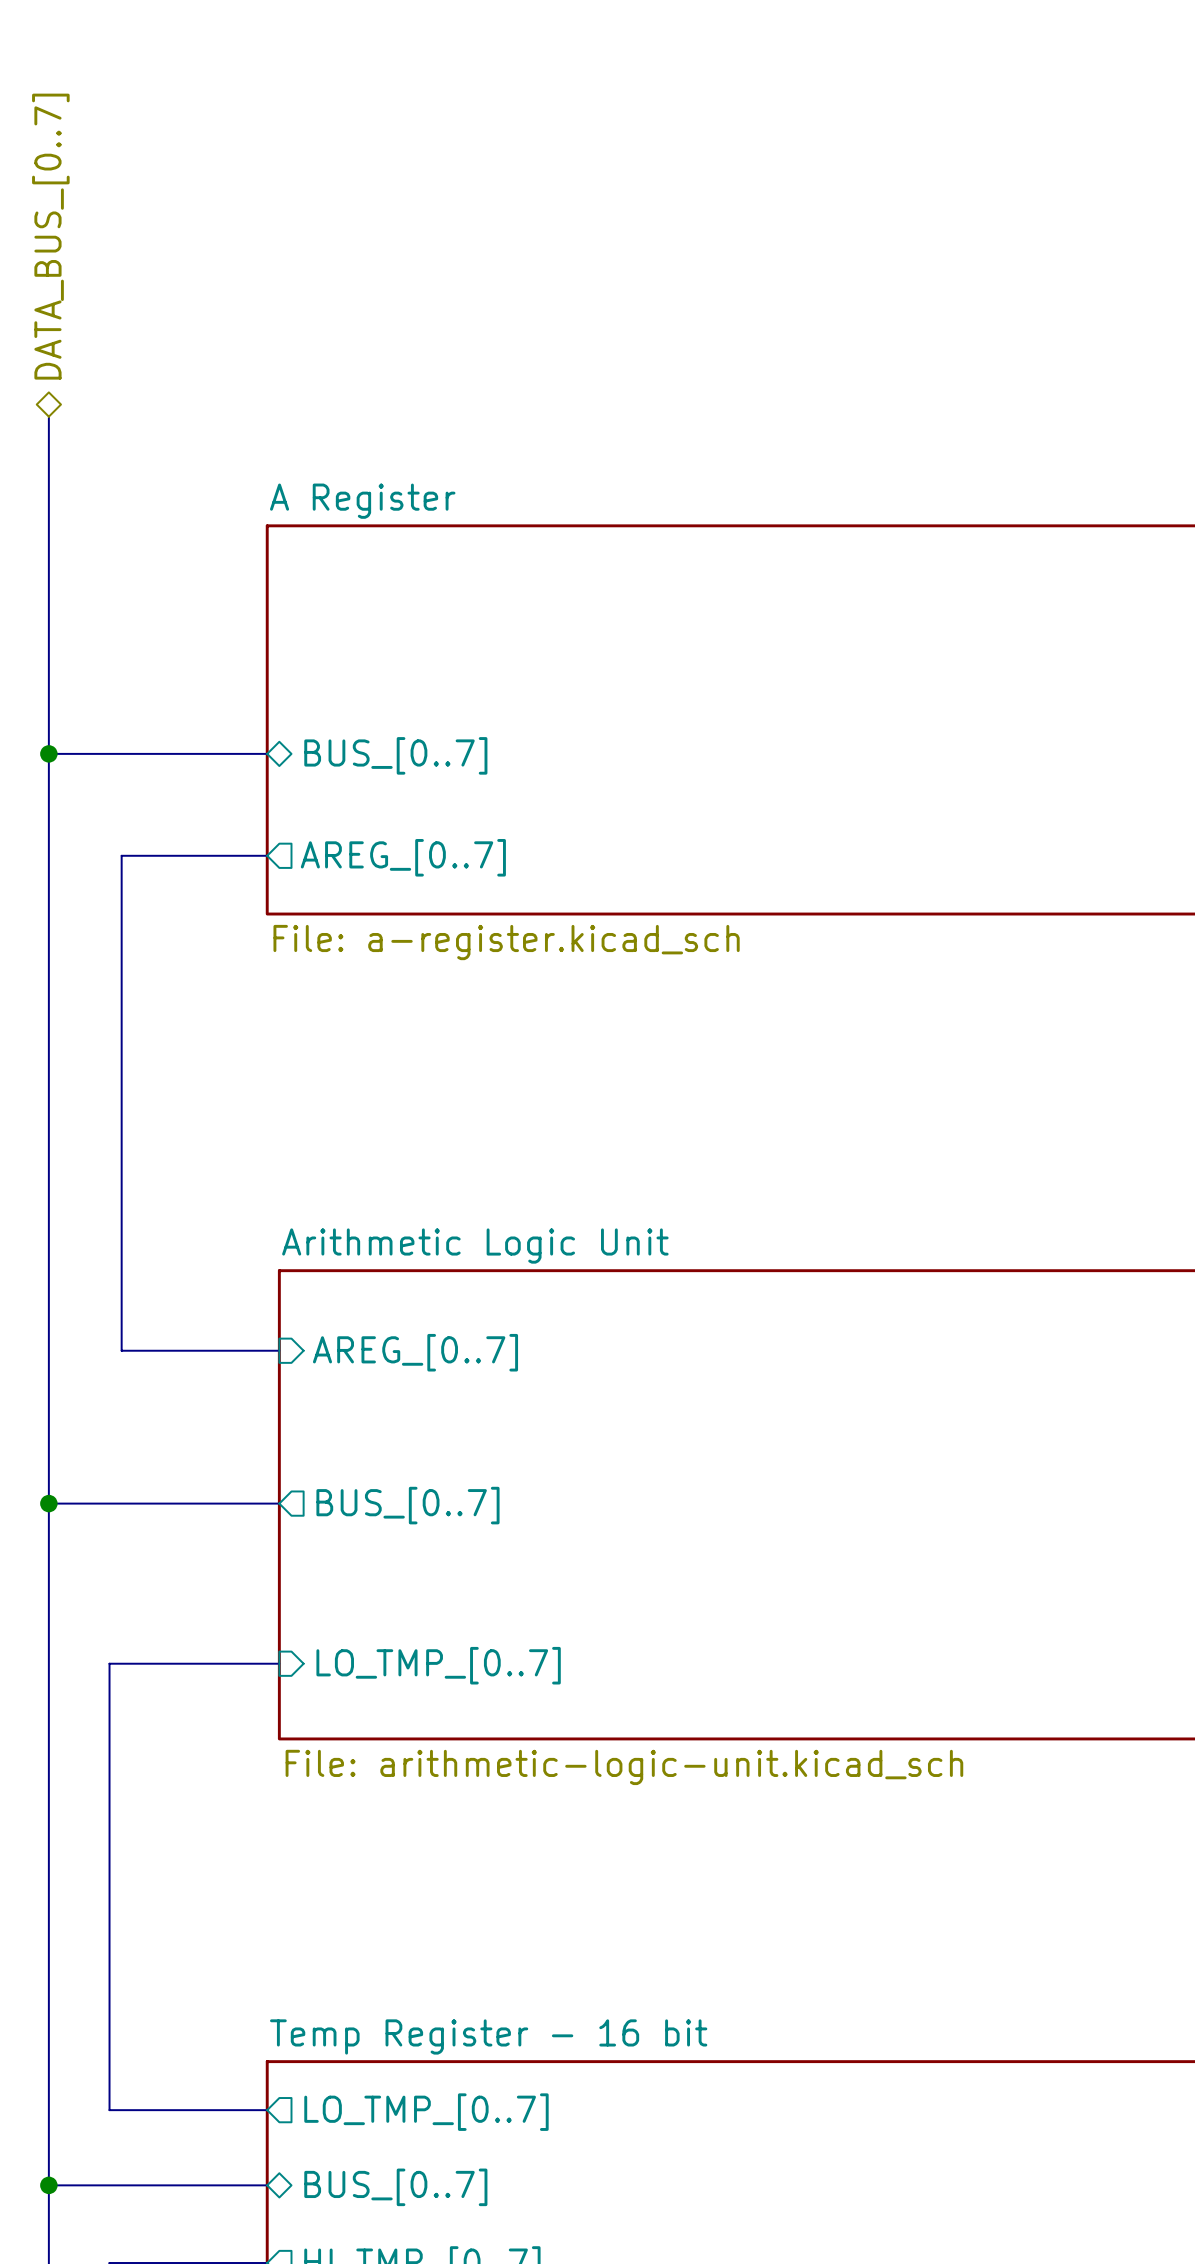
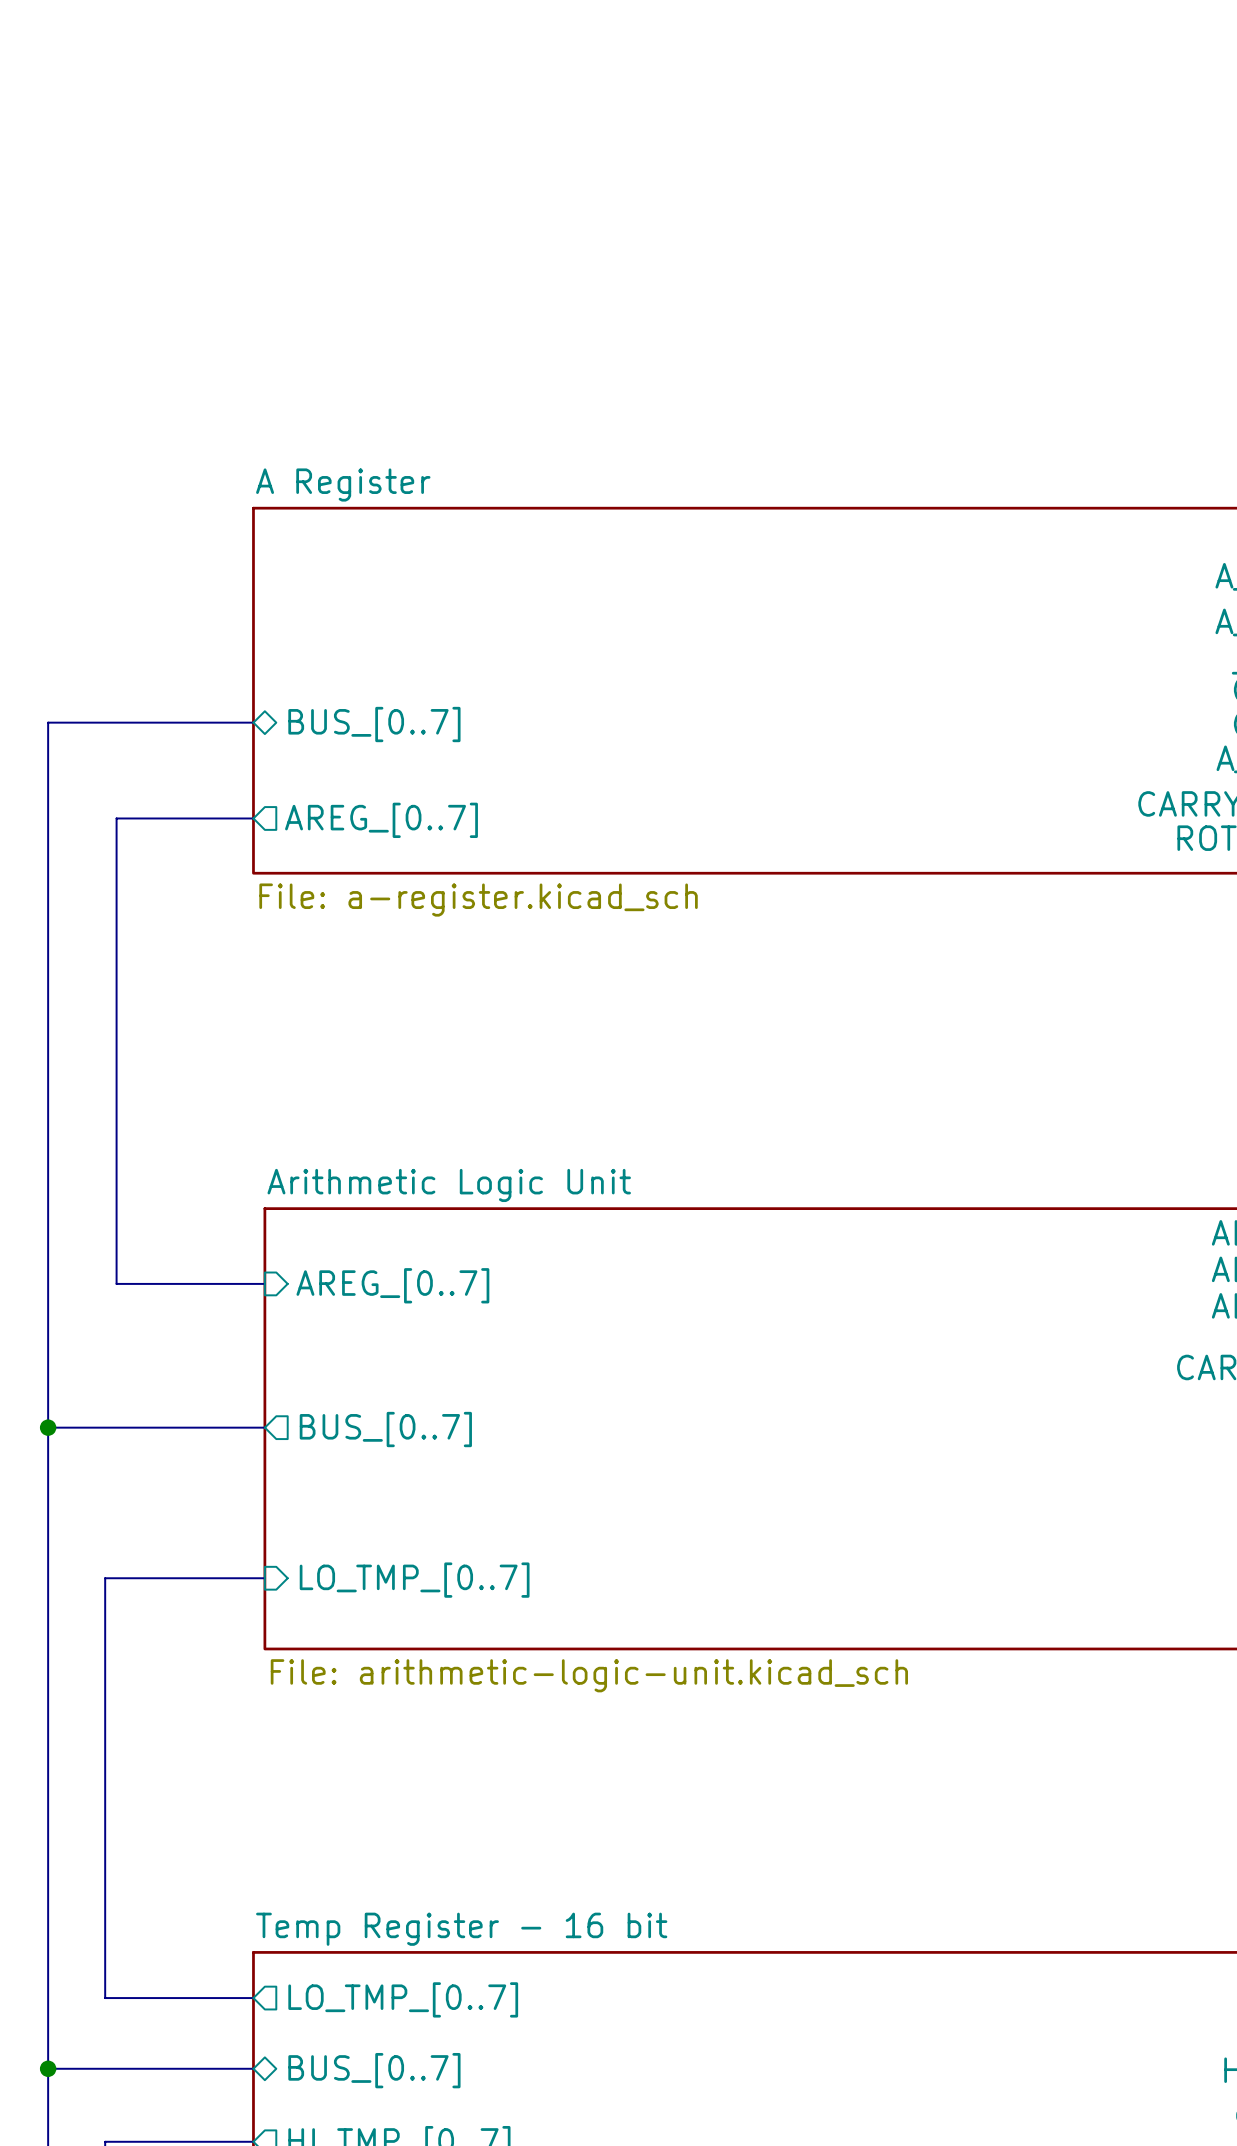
hierarchical label: DATA_BUS_[0..7] (50, 236) -> none
bus: (48, 416) (48, 753) -> none
junction: (48, 753) -> none

